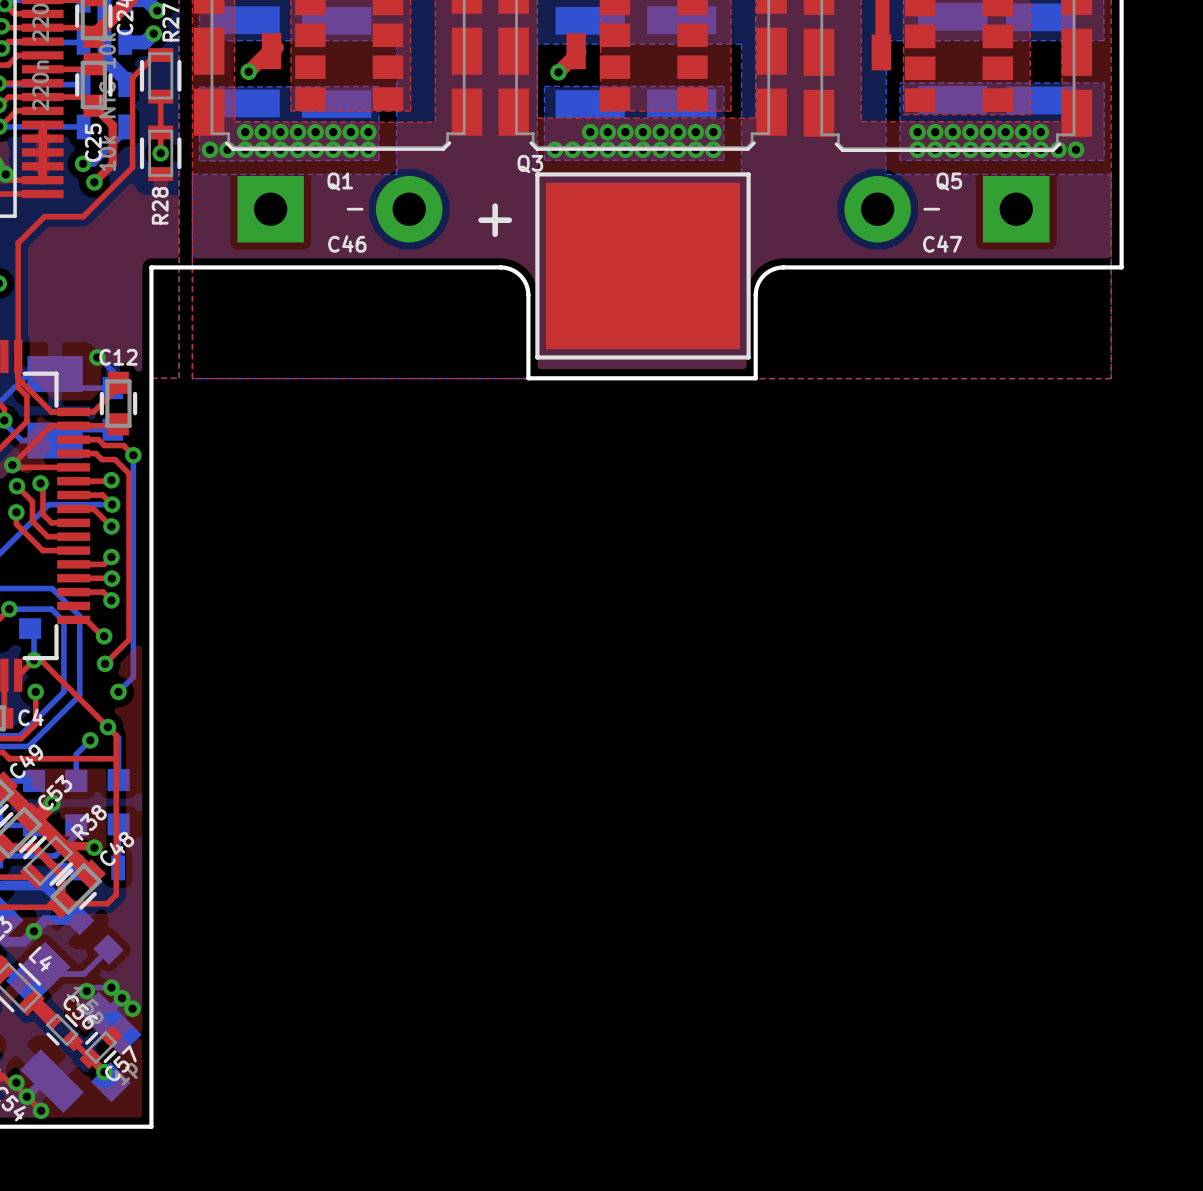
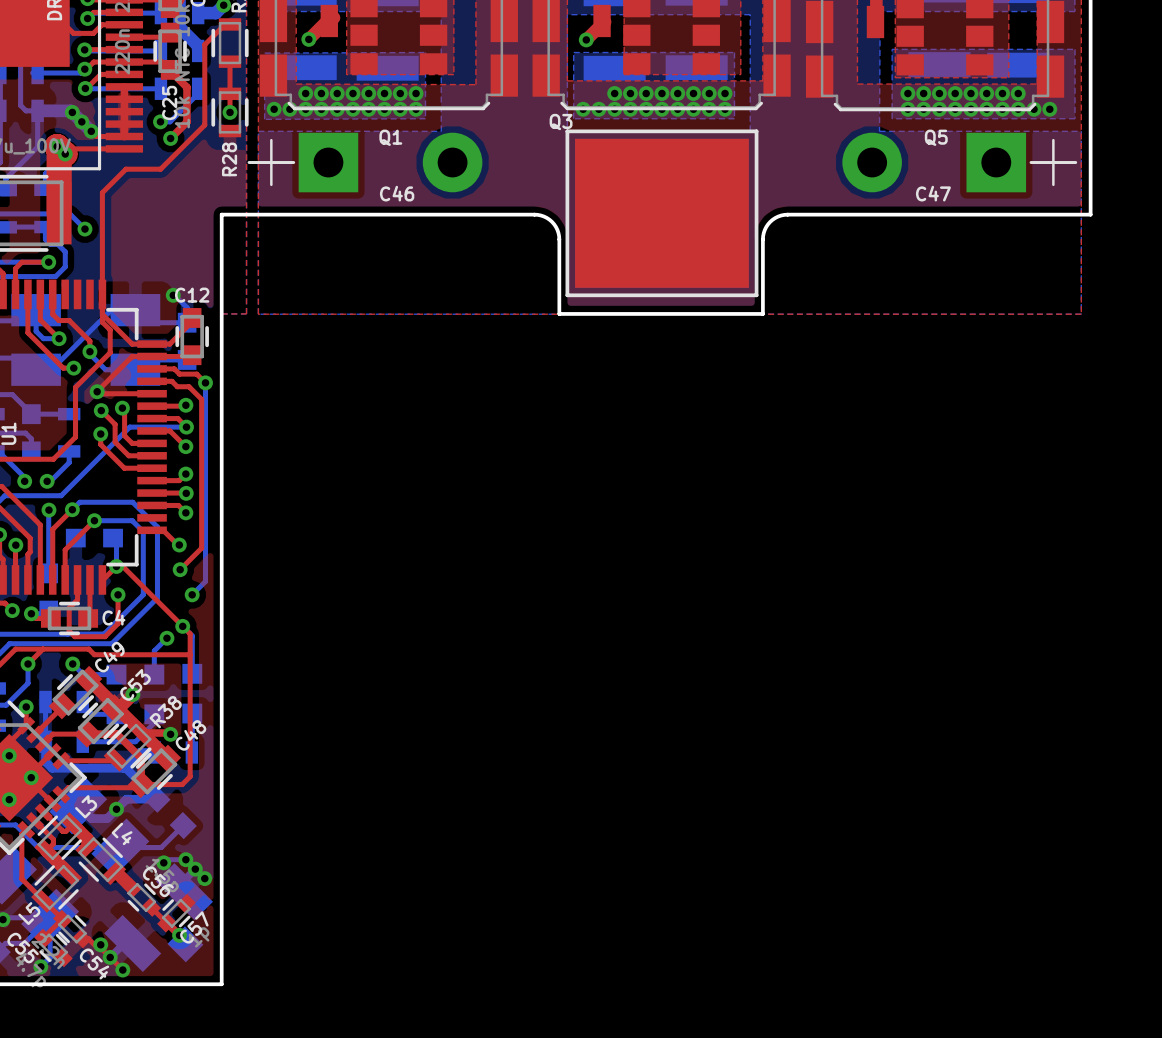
C46 footprint: [237, 175, 443, 243] -> [247, 132, 483, 193]
C47 footprint: [844, 175, 1050, 243] -> [842, 132, 1078, 193]
line: (495, 206) (495, 234) -> none
line: (481, 220) (509, 220) -> none

